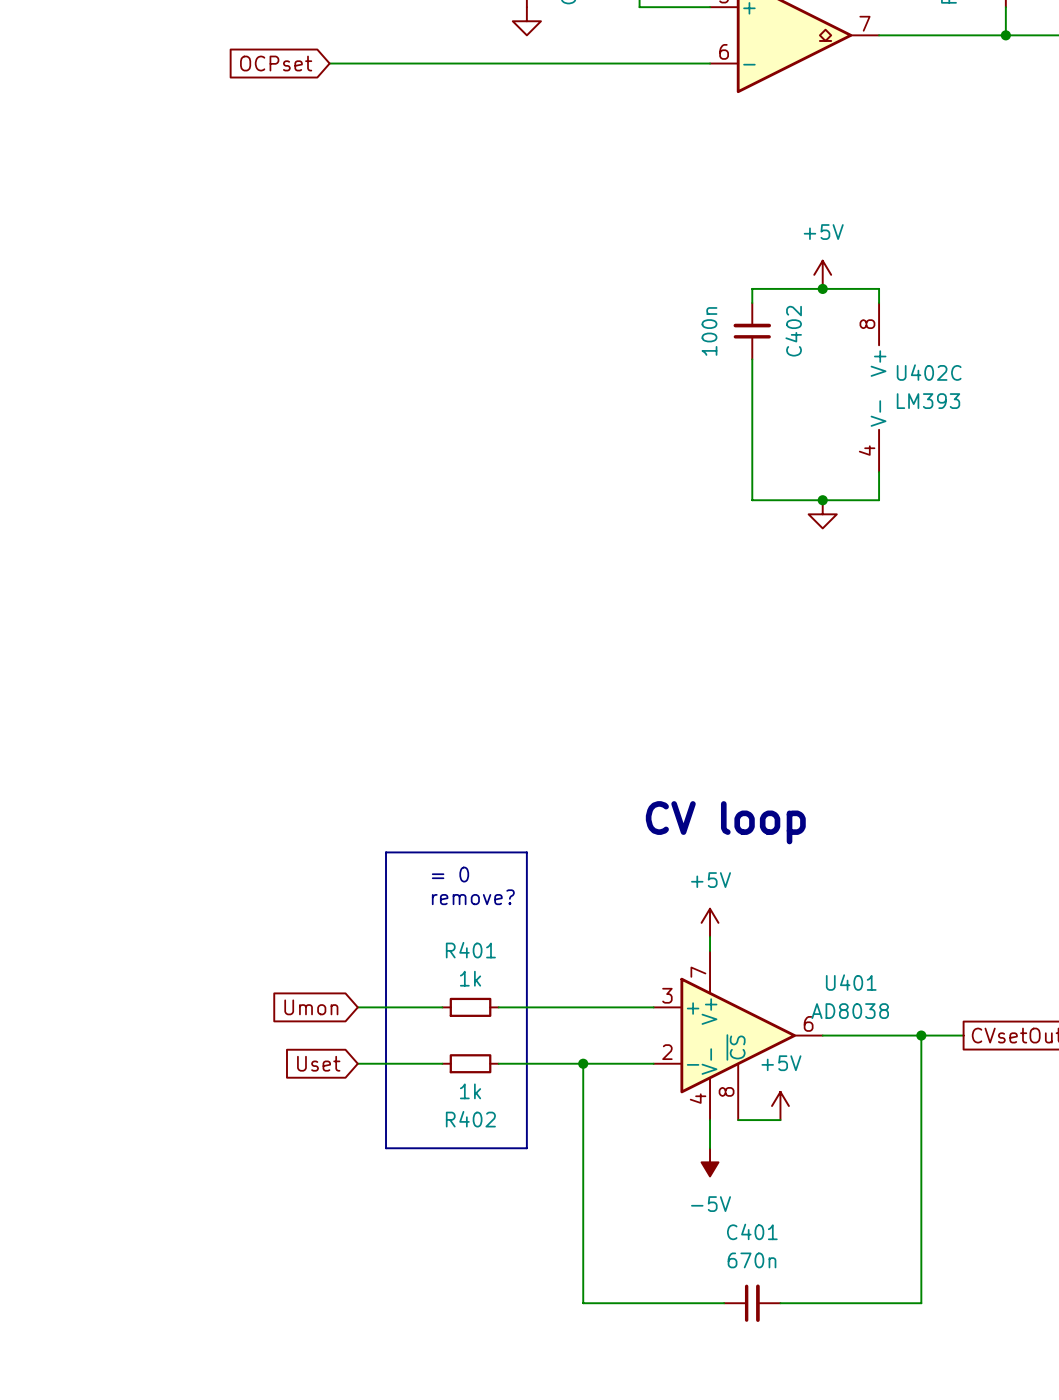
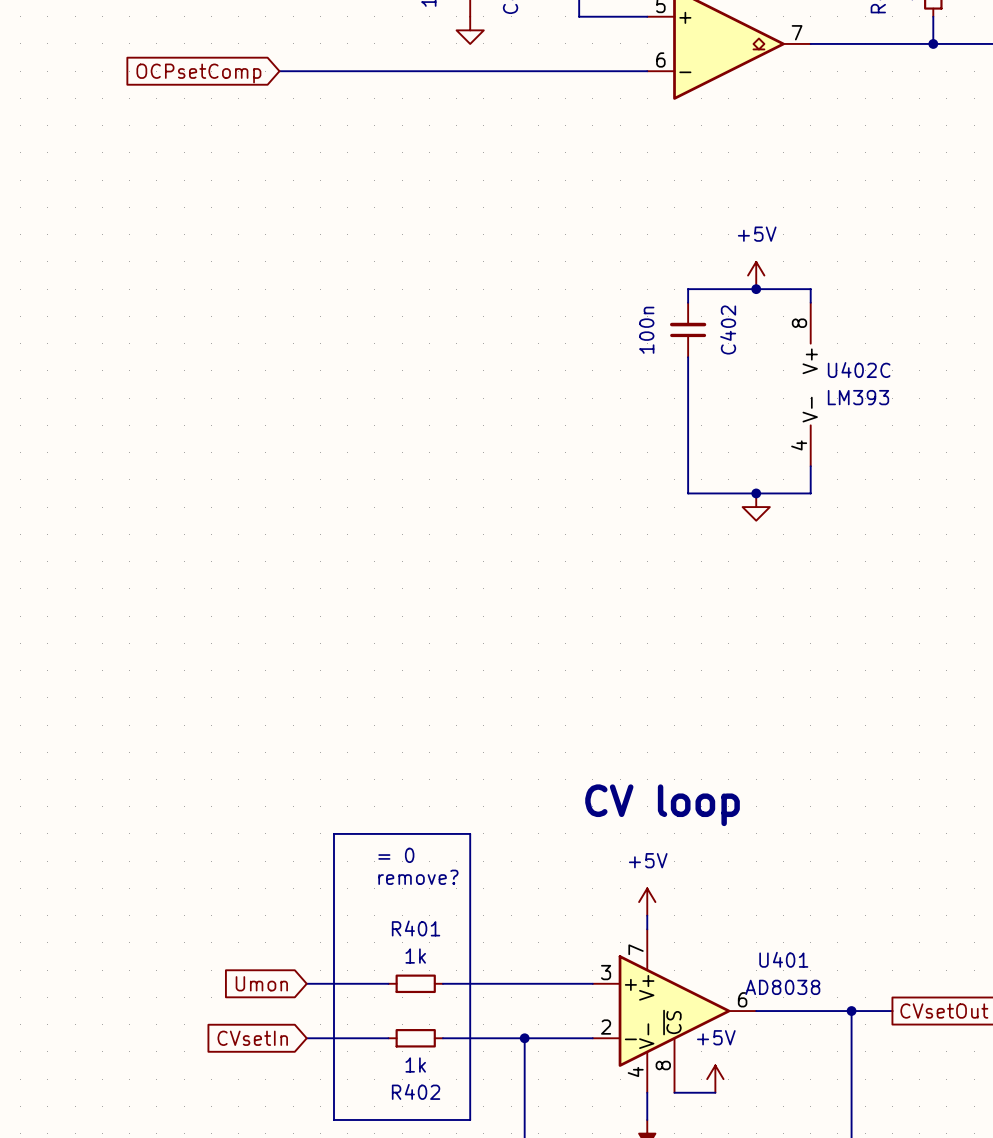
global label: OCPset (276, 63) -> OCPsetComp (198, 73)
global label: Uset (318, 1063) -> CVsetIn (252, 1038)

